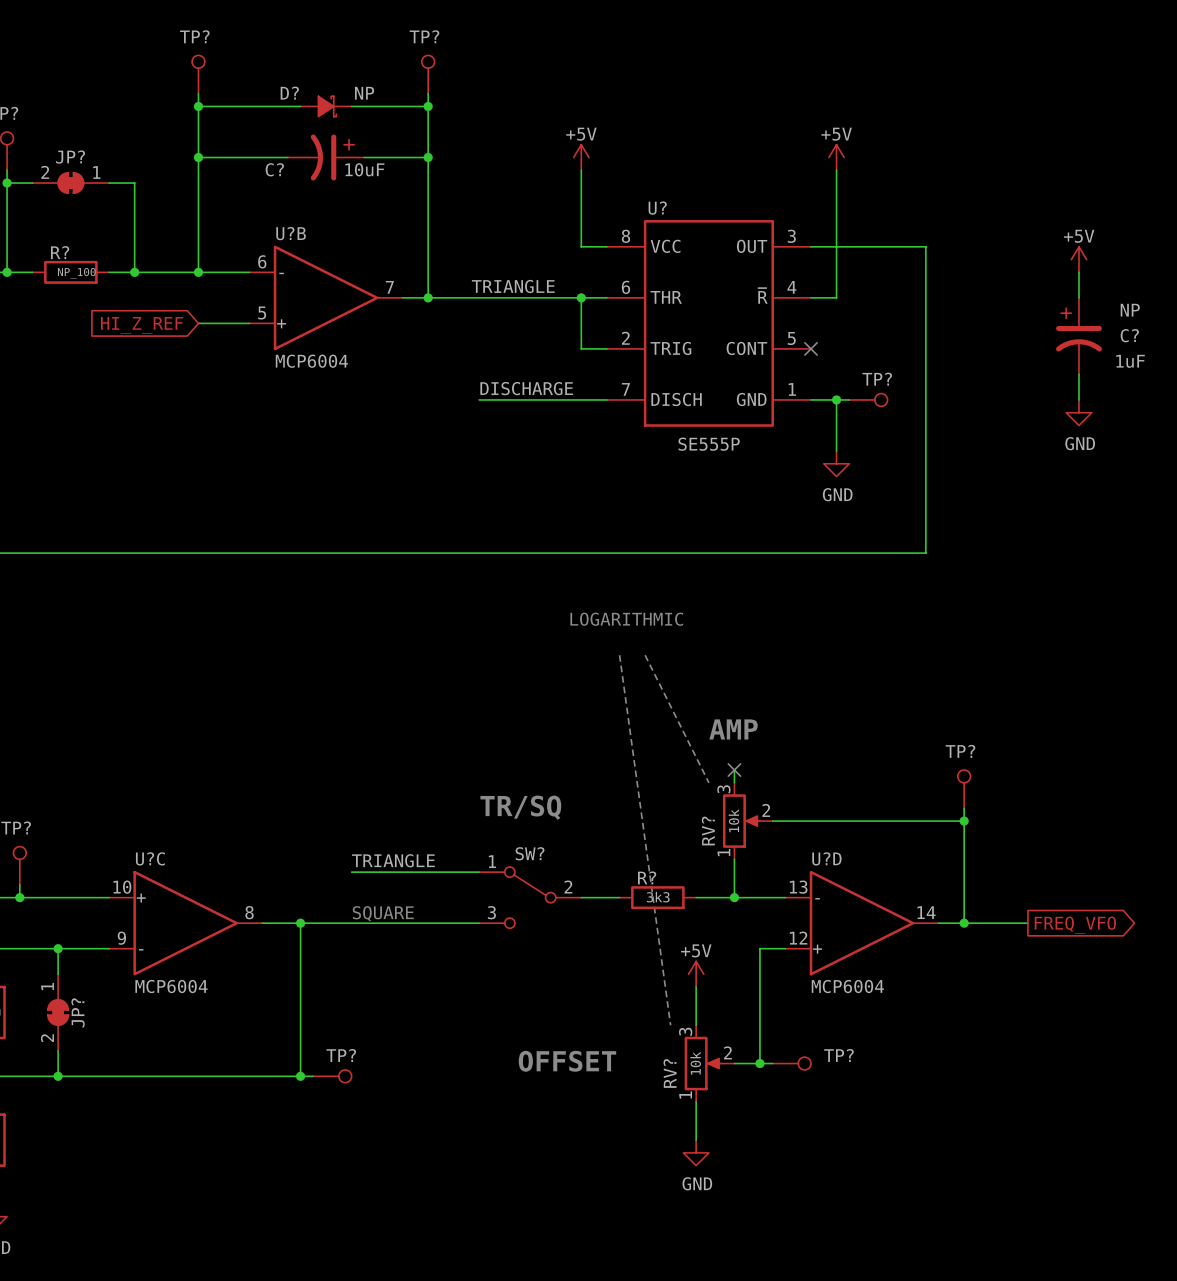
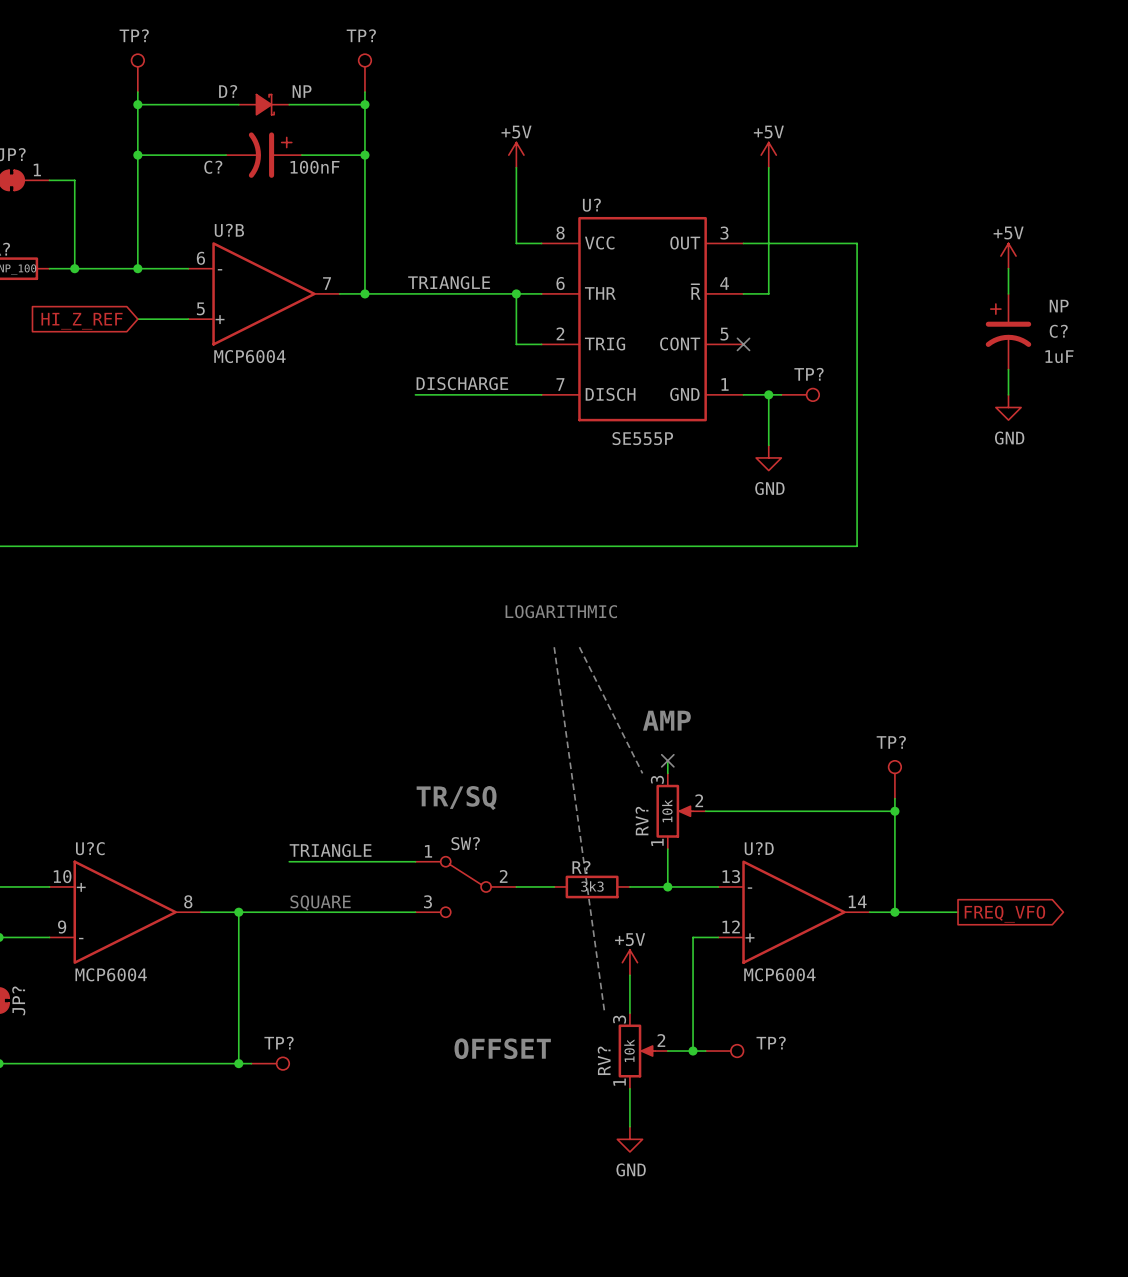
C? value: 10uF (364, 169) -> 100nF (315, 167)

